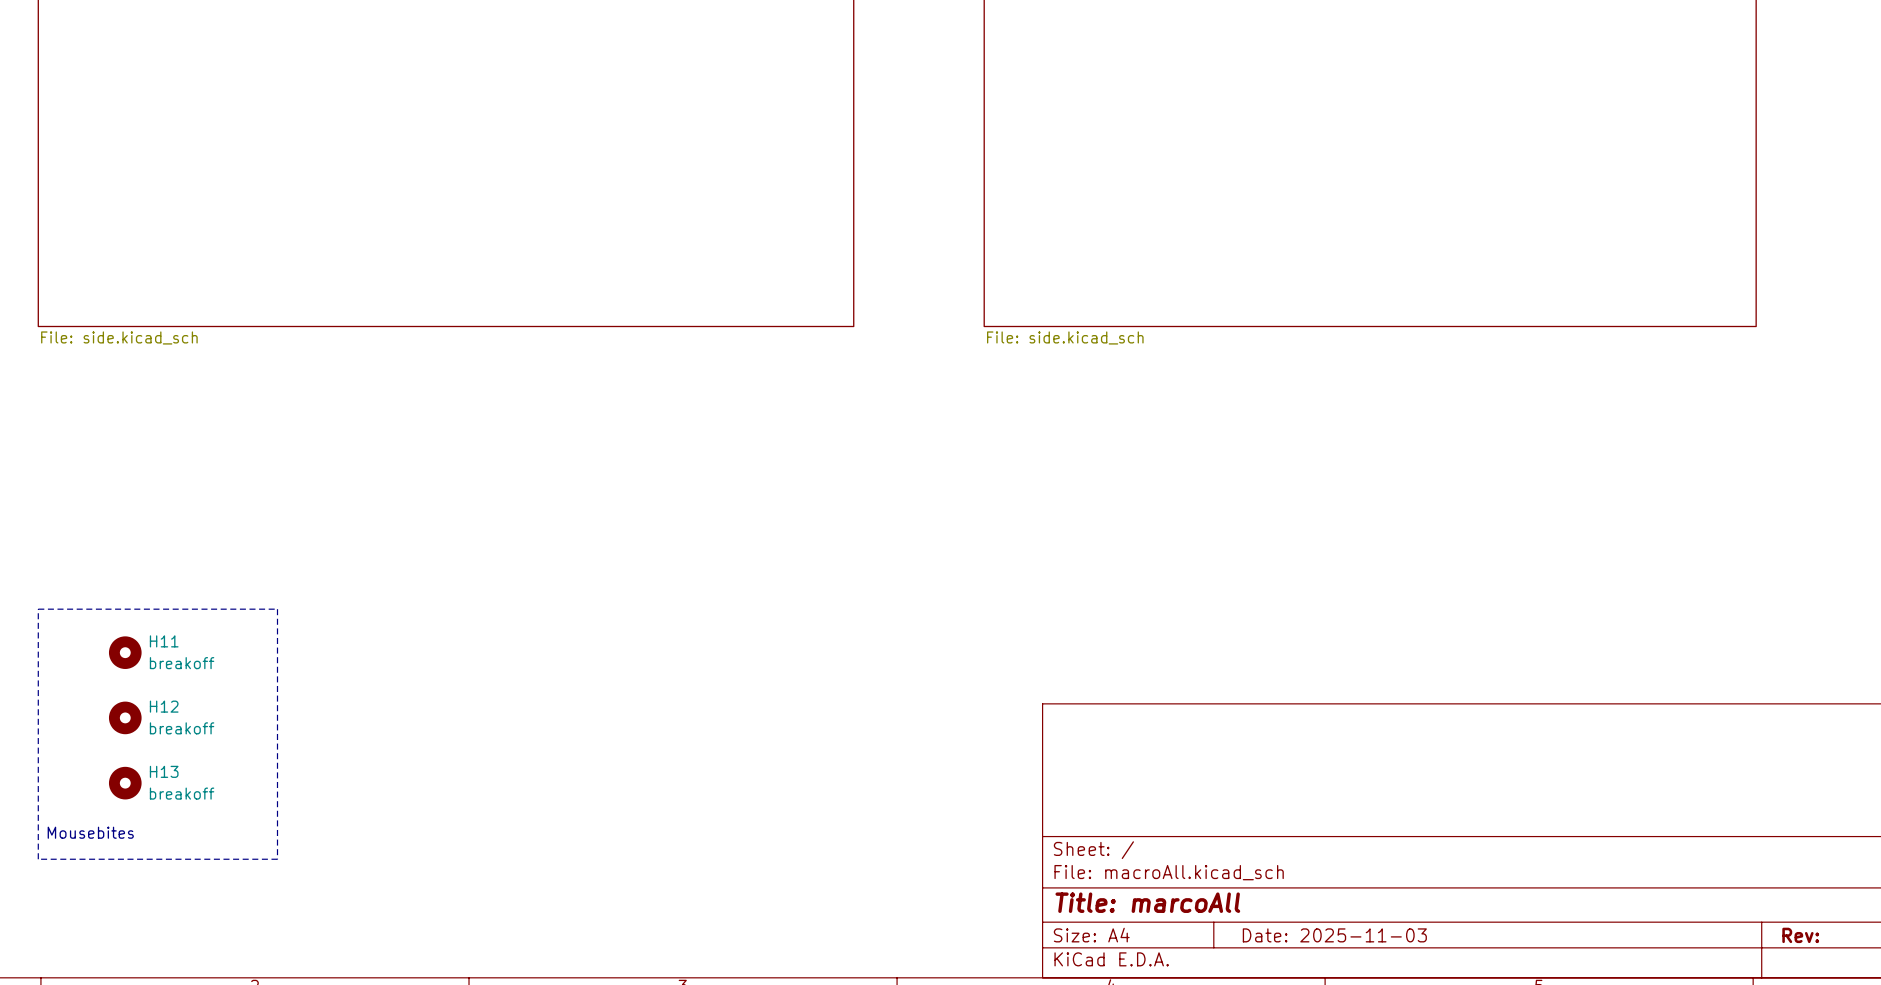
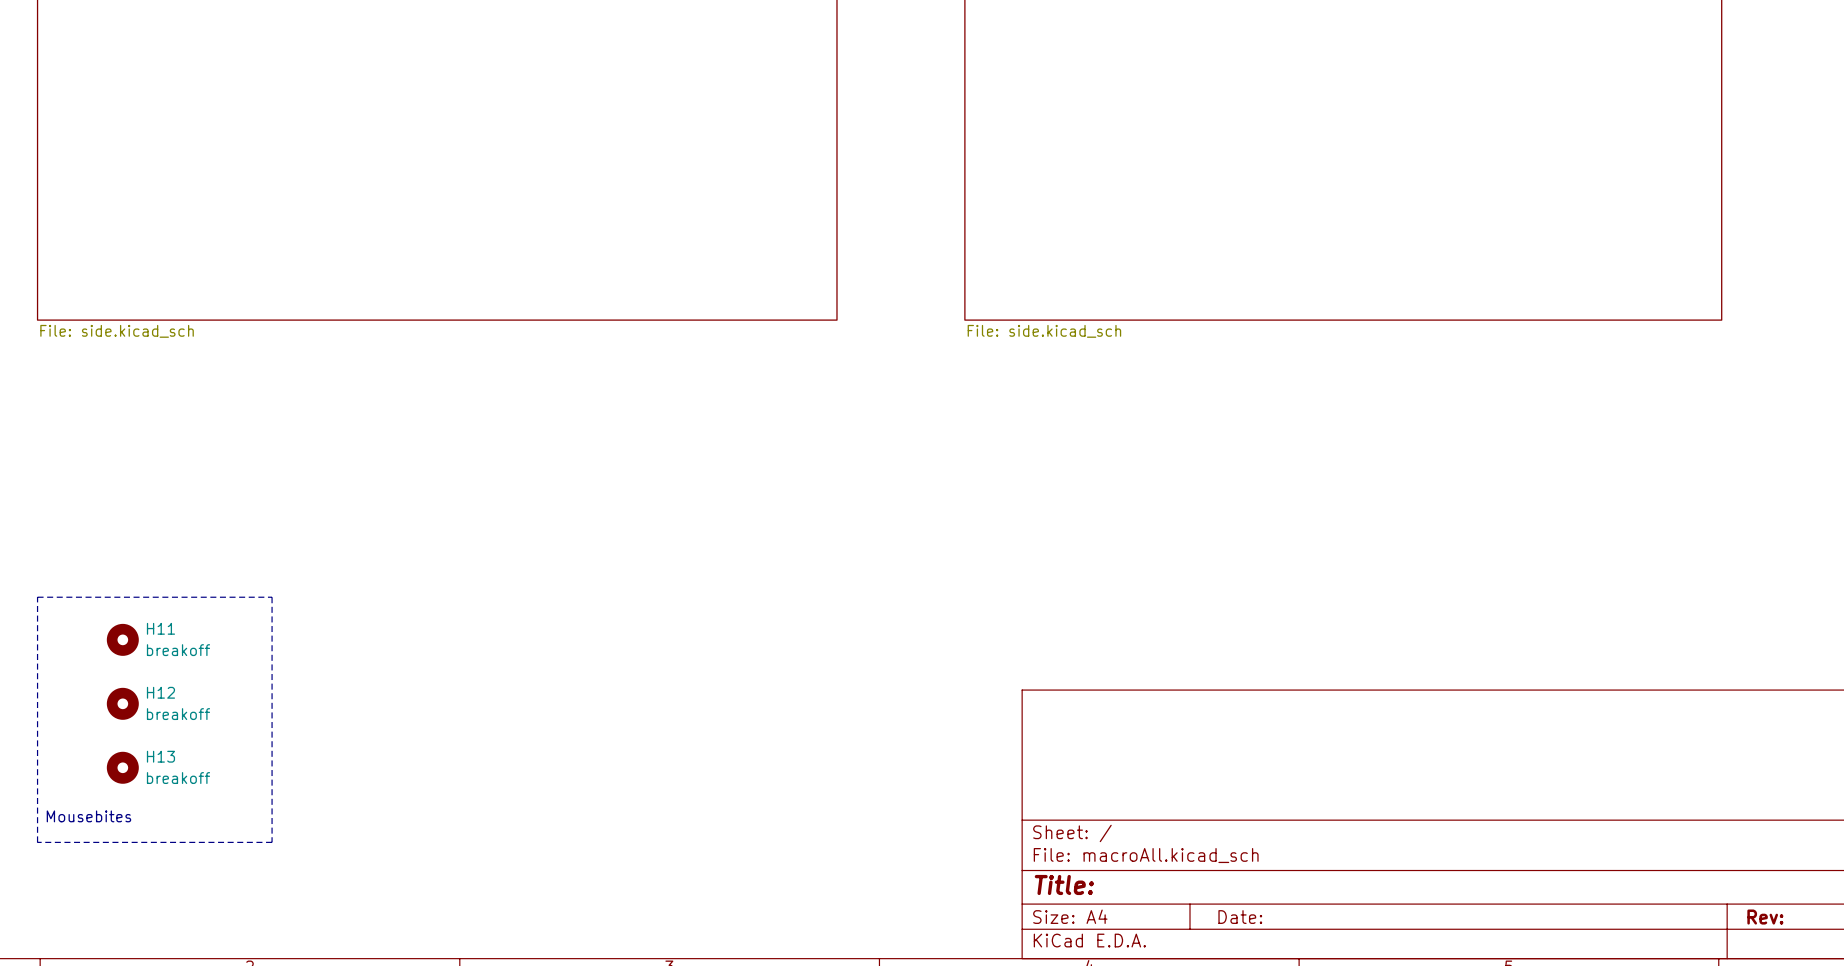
title block: Title: marcoAll (1147, 902) -> Title: (1064, 884)
title block: Date: 2025-11-03 (1334, 935) -> Date: (1240, 917)

